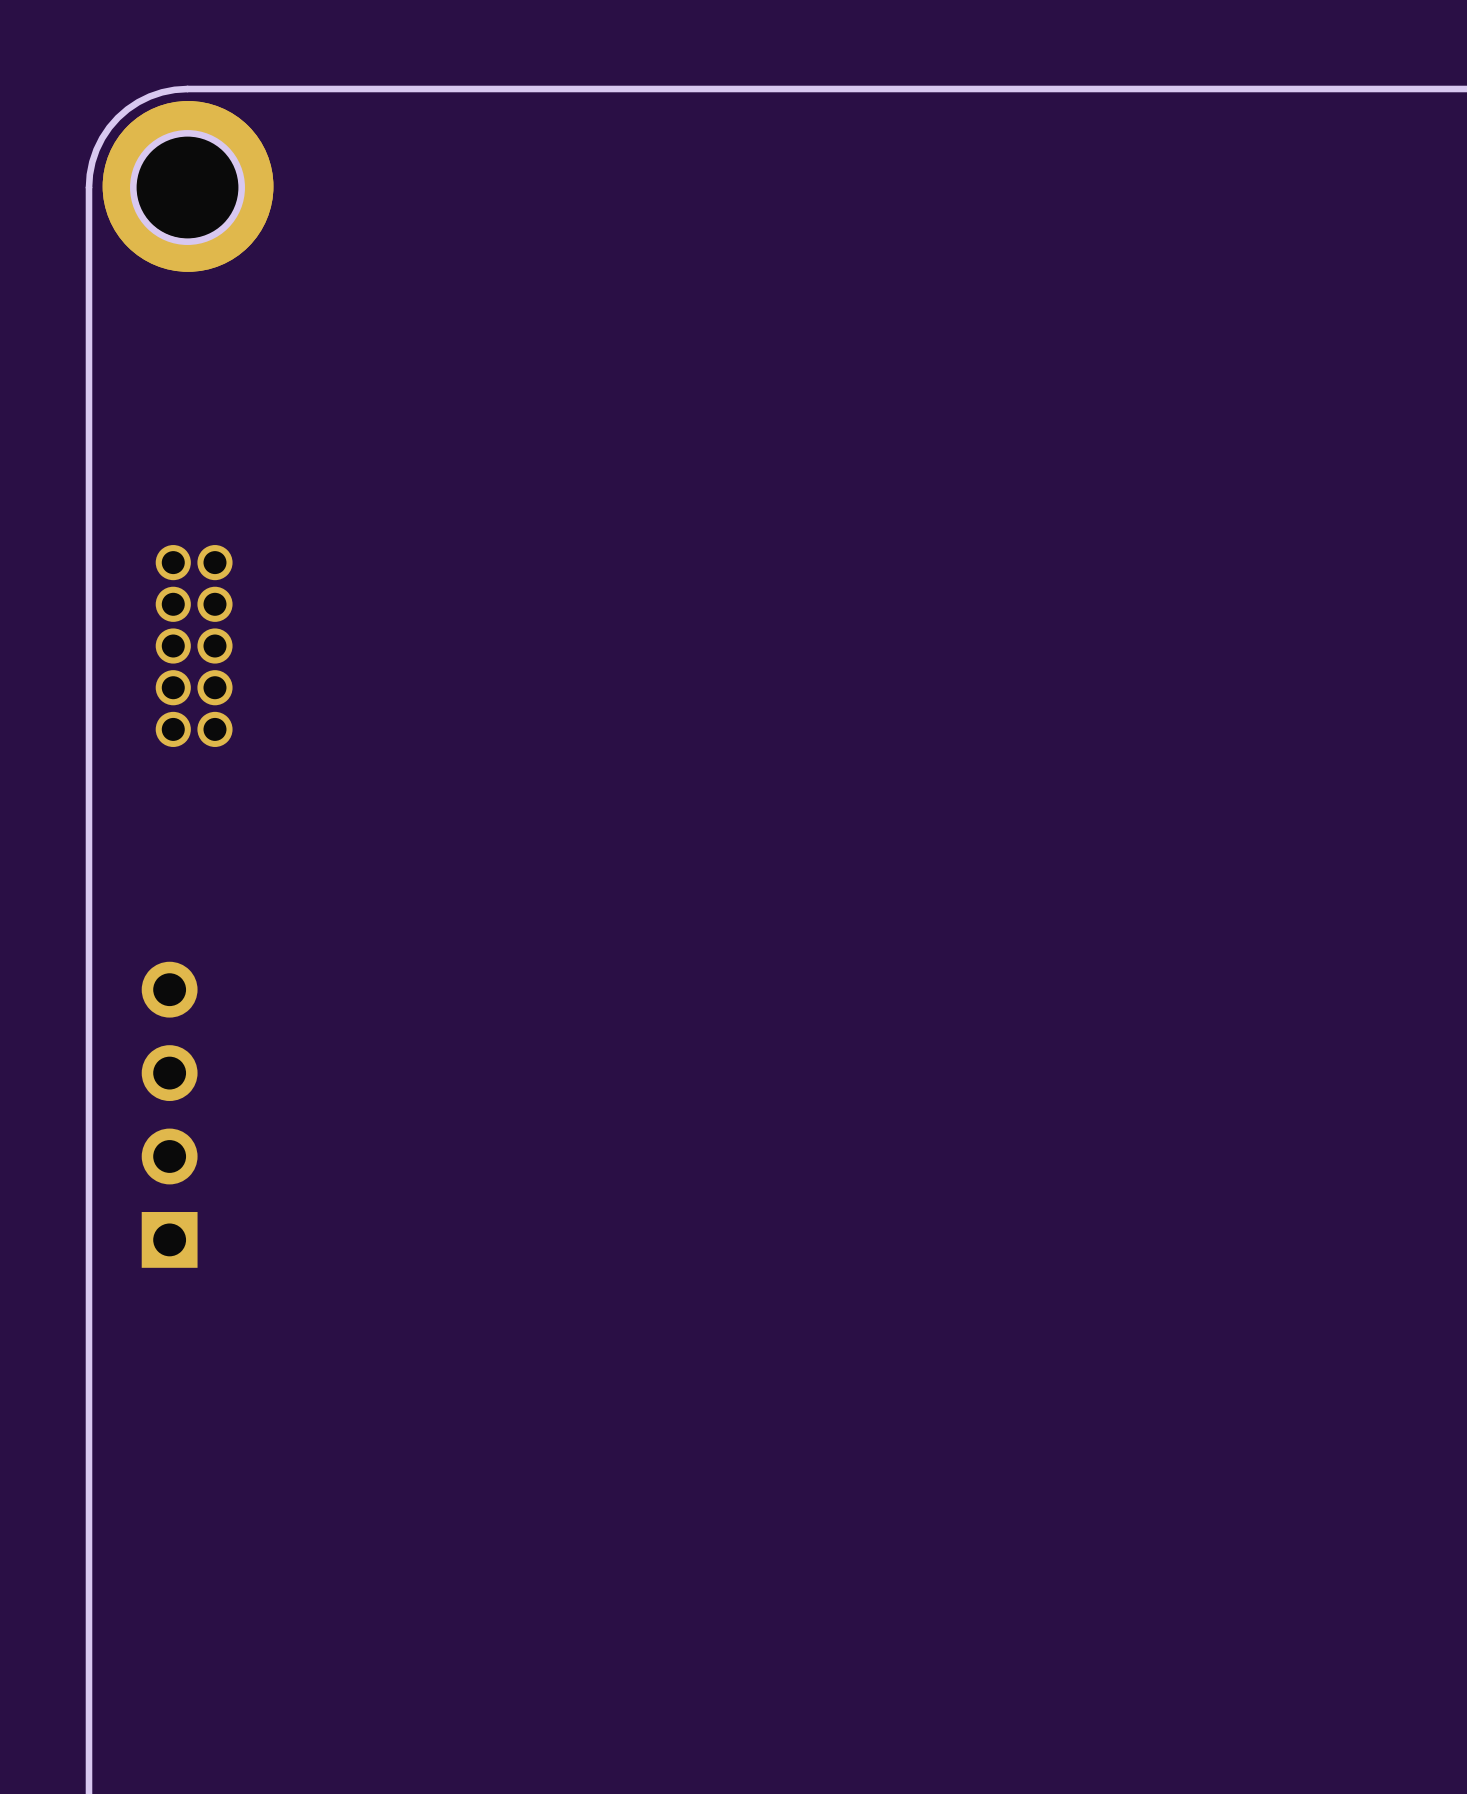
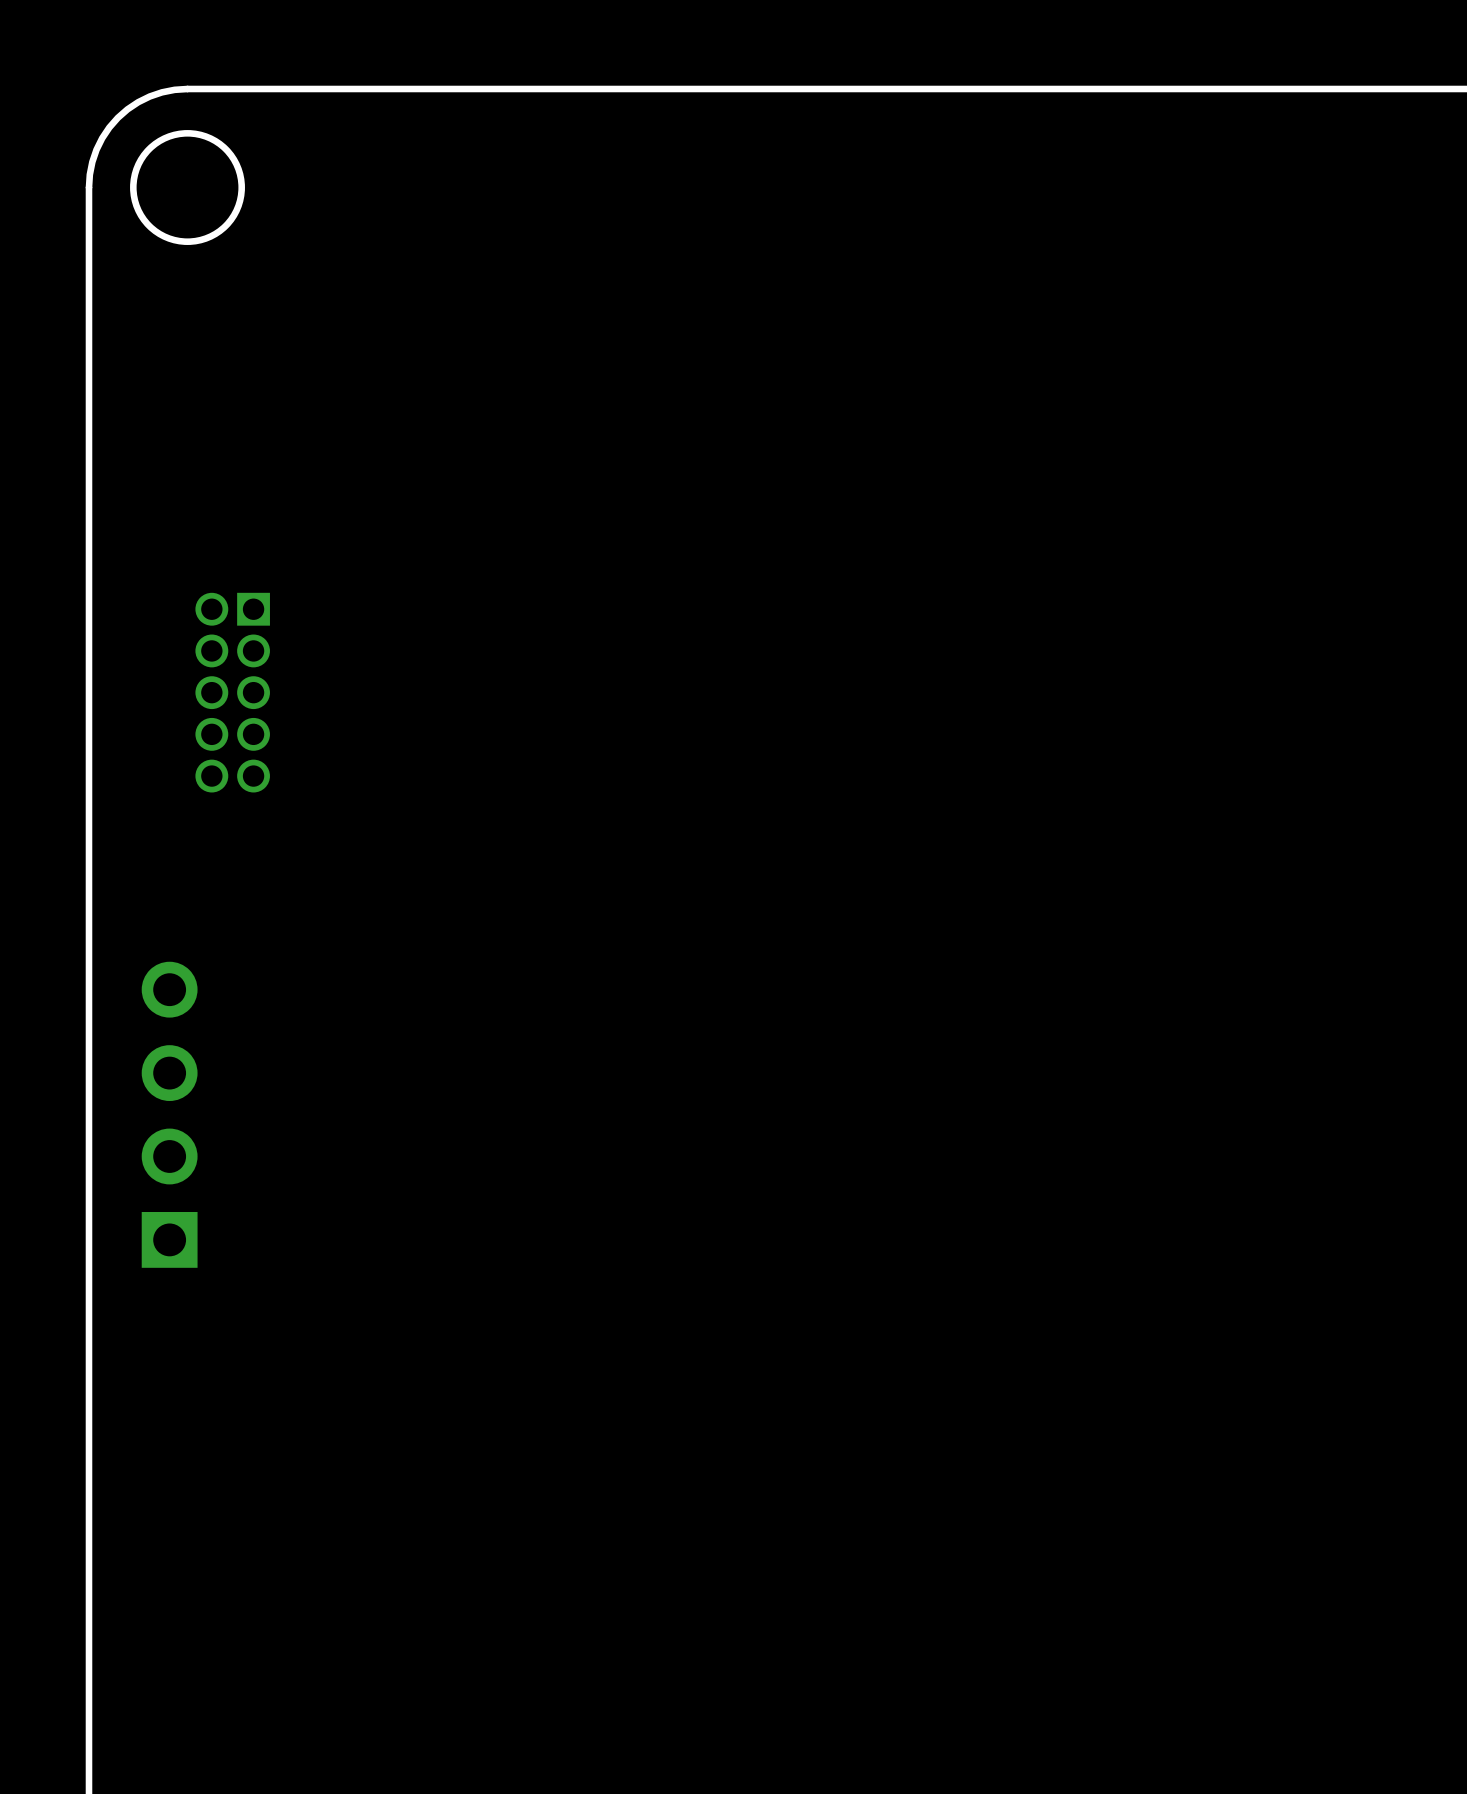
part: (188, 186) -> none
part: (194, 646) -> none
part: none -> (232, 692)

